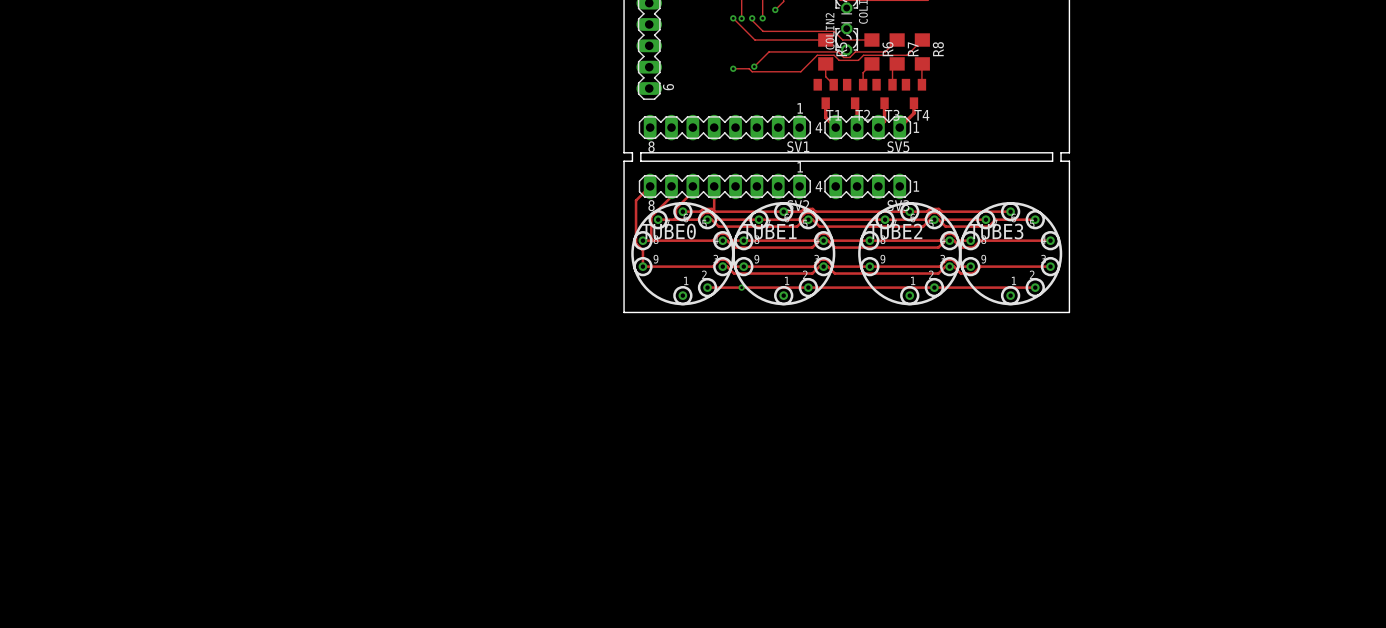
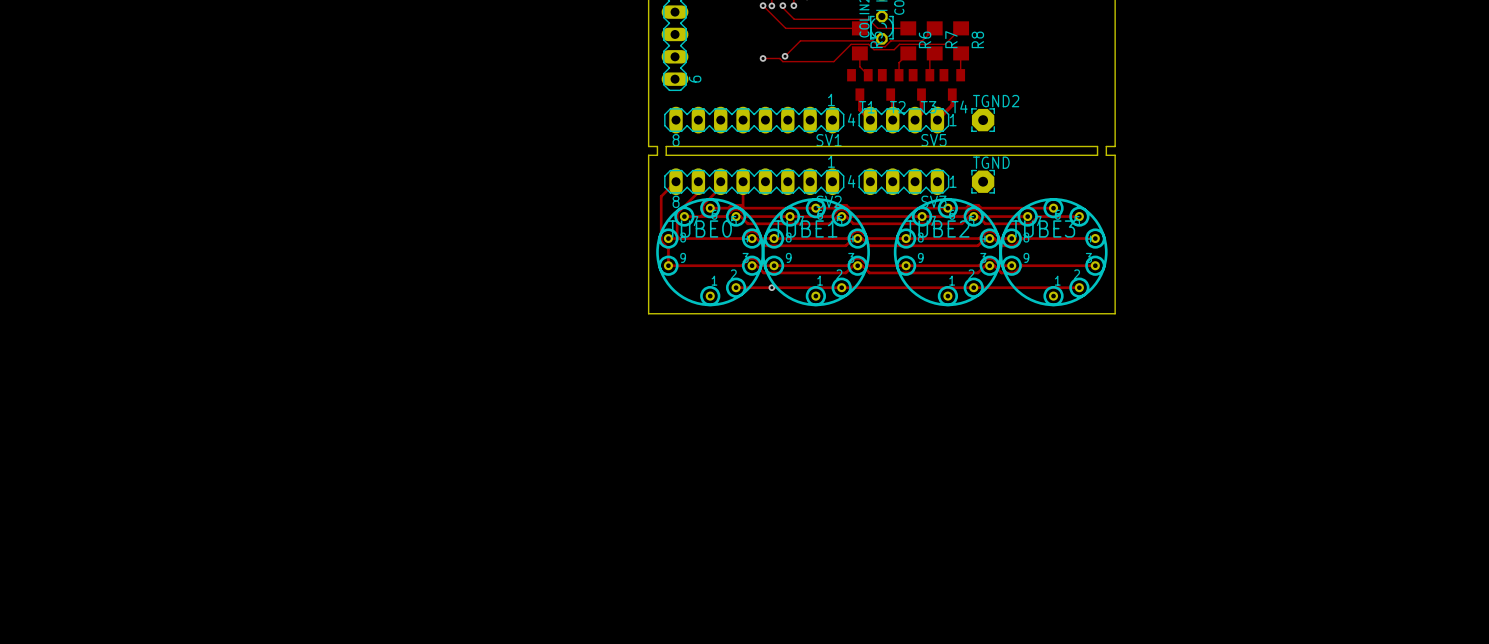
TGND2: none -> (983, 120)
TGND: none -> (983, 181)

